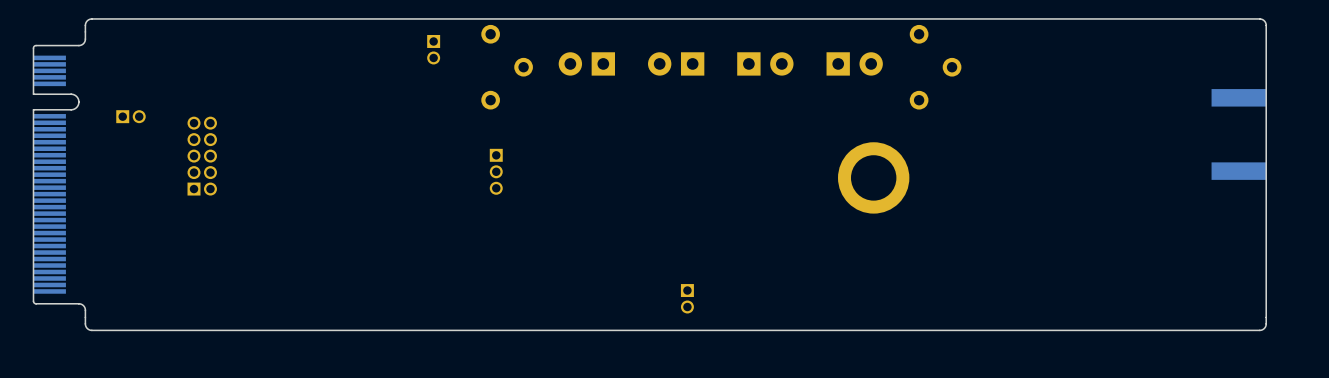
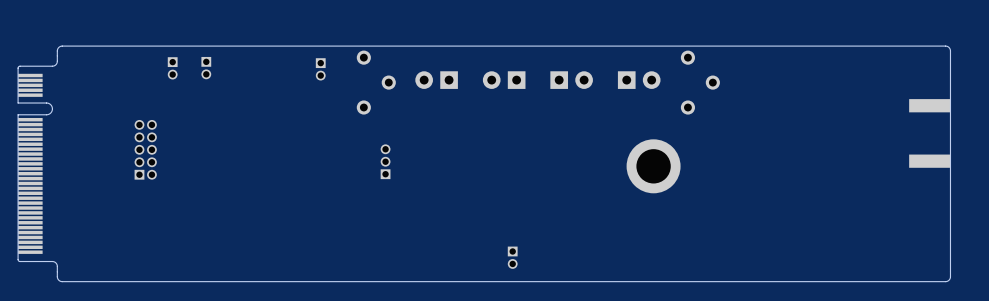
part: none -> (172, 68)
part: none -> (206, 68)
part: (130, 116) -> none
part rotation: 0° (496, 171) -> 180° (385, 161)

